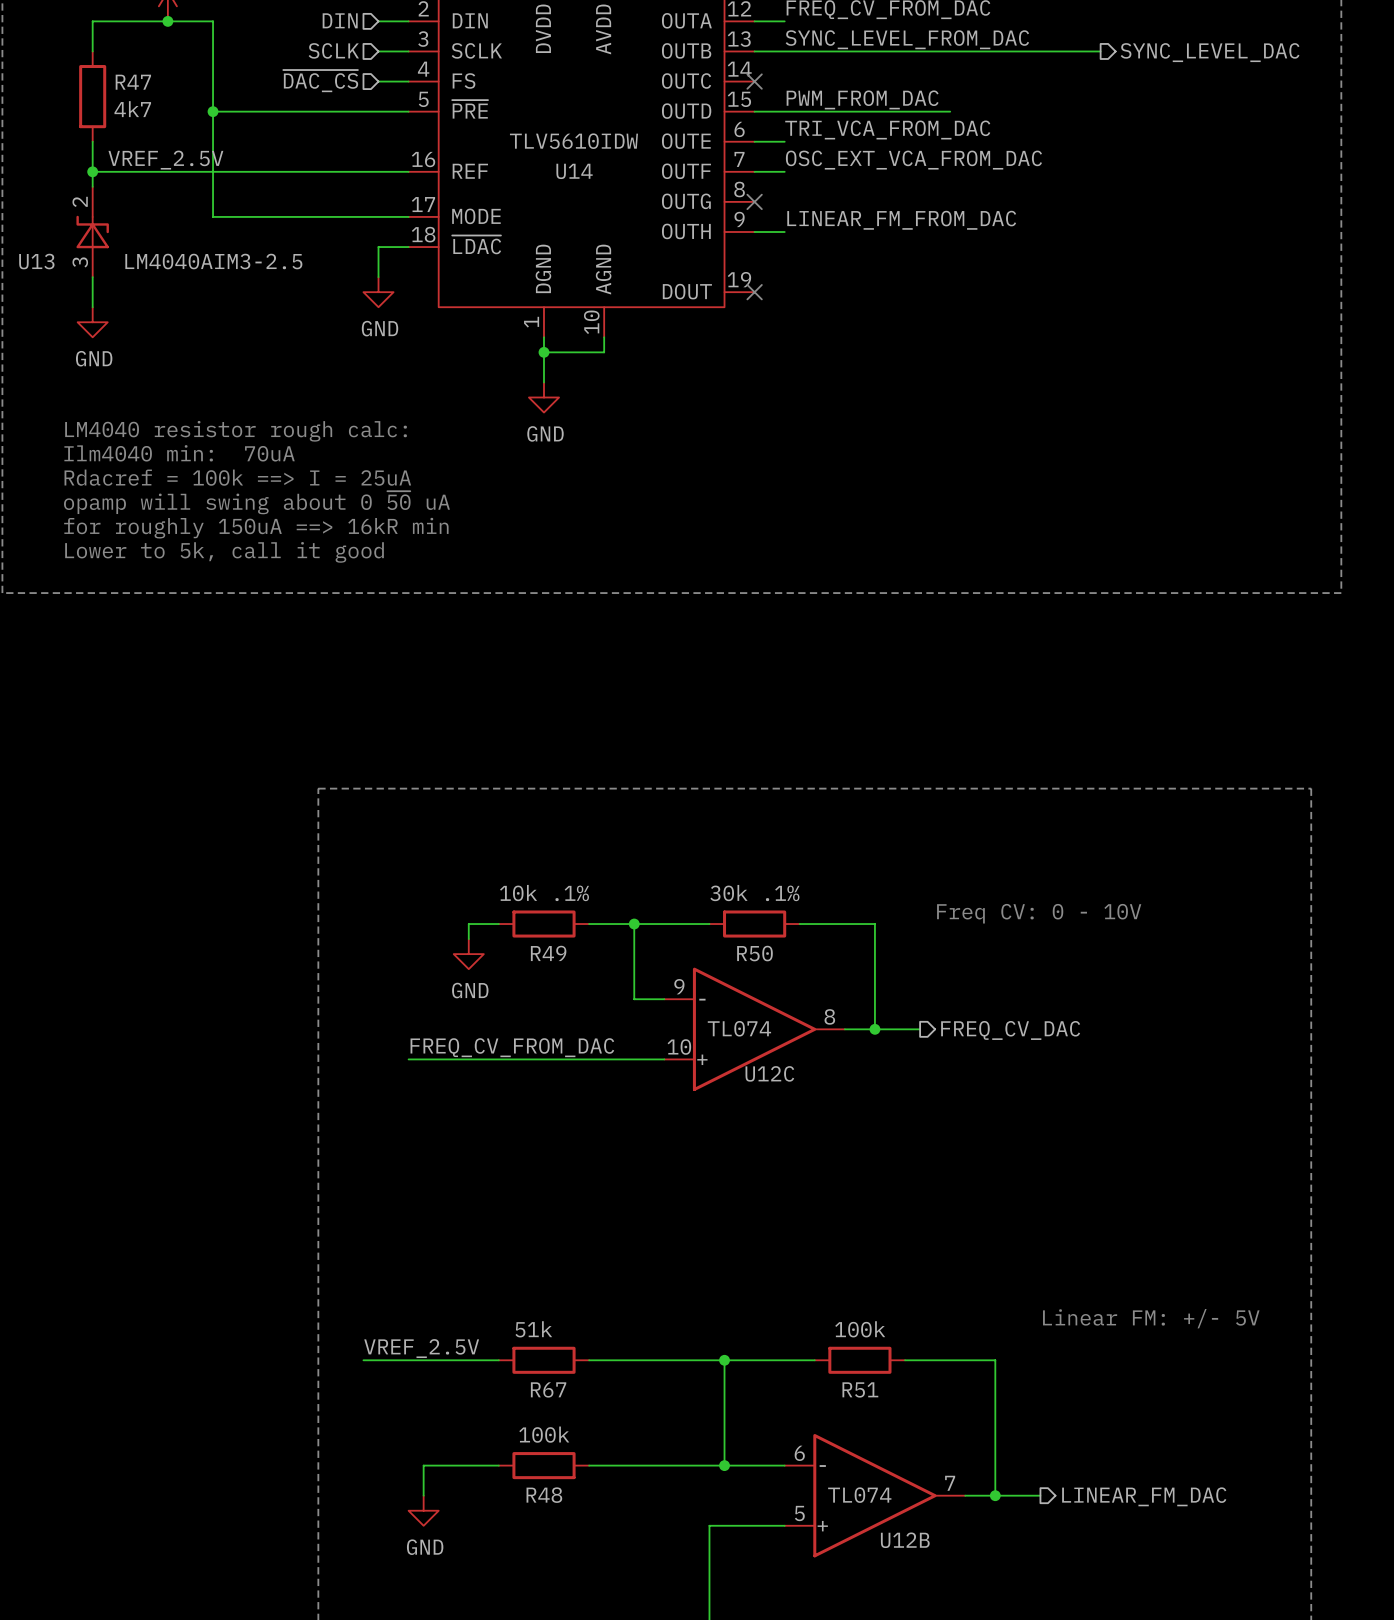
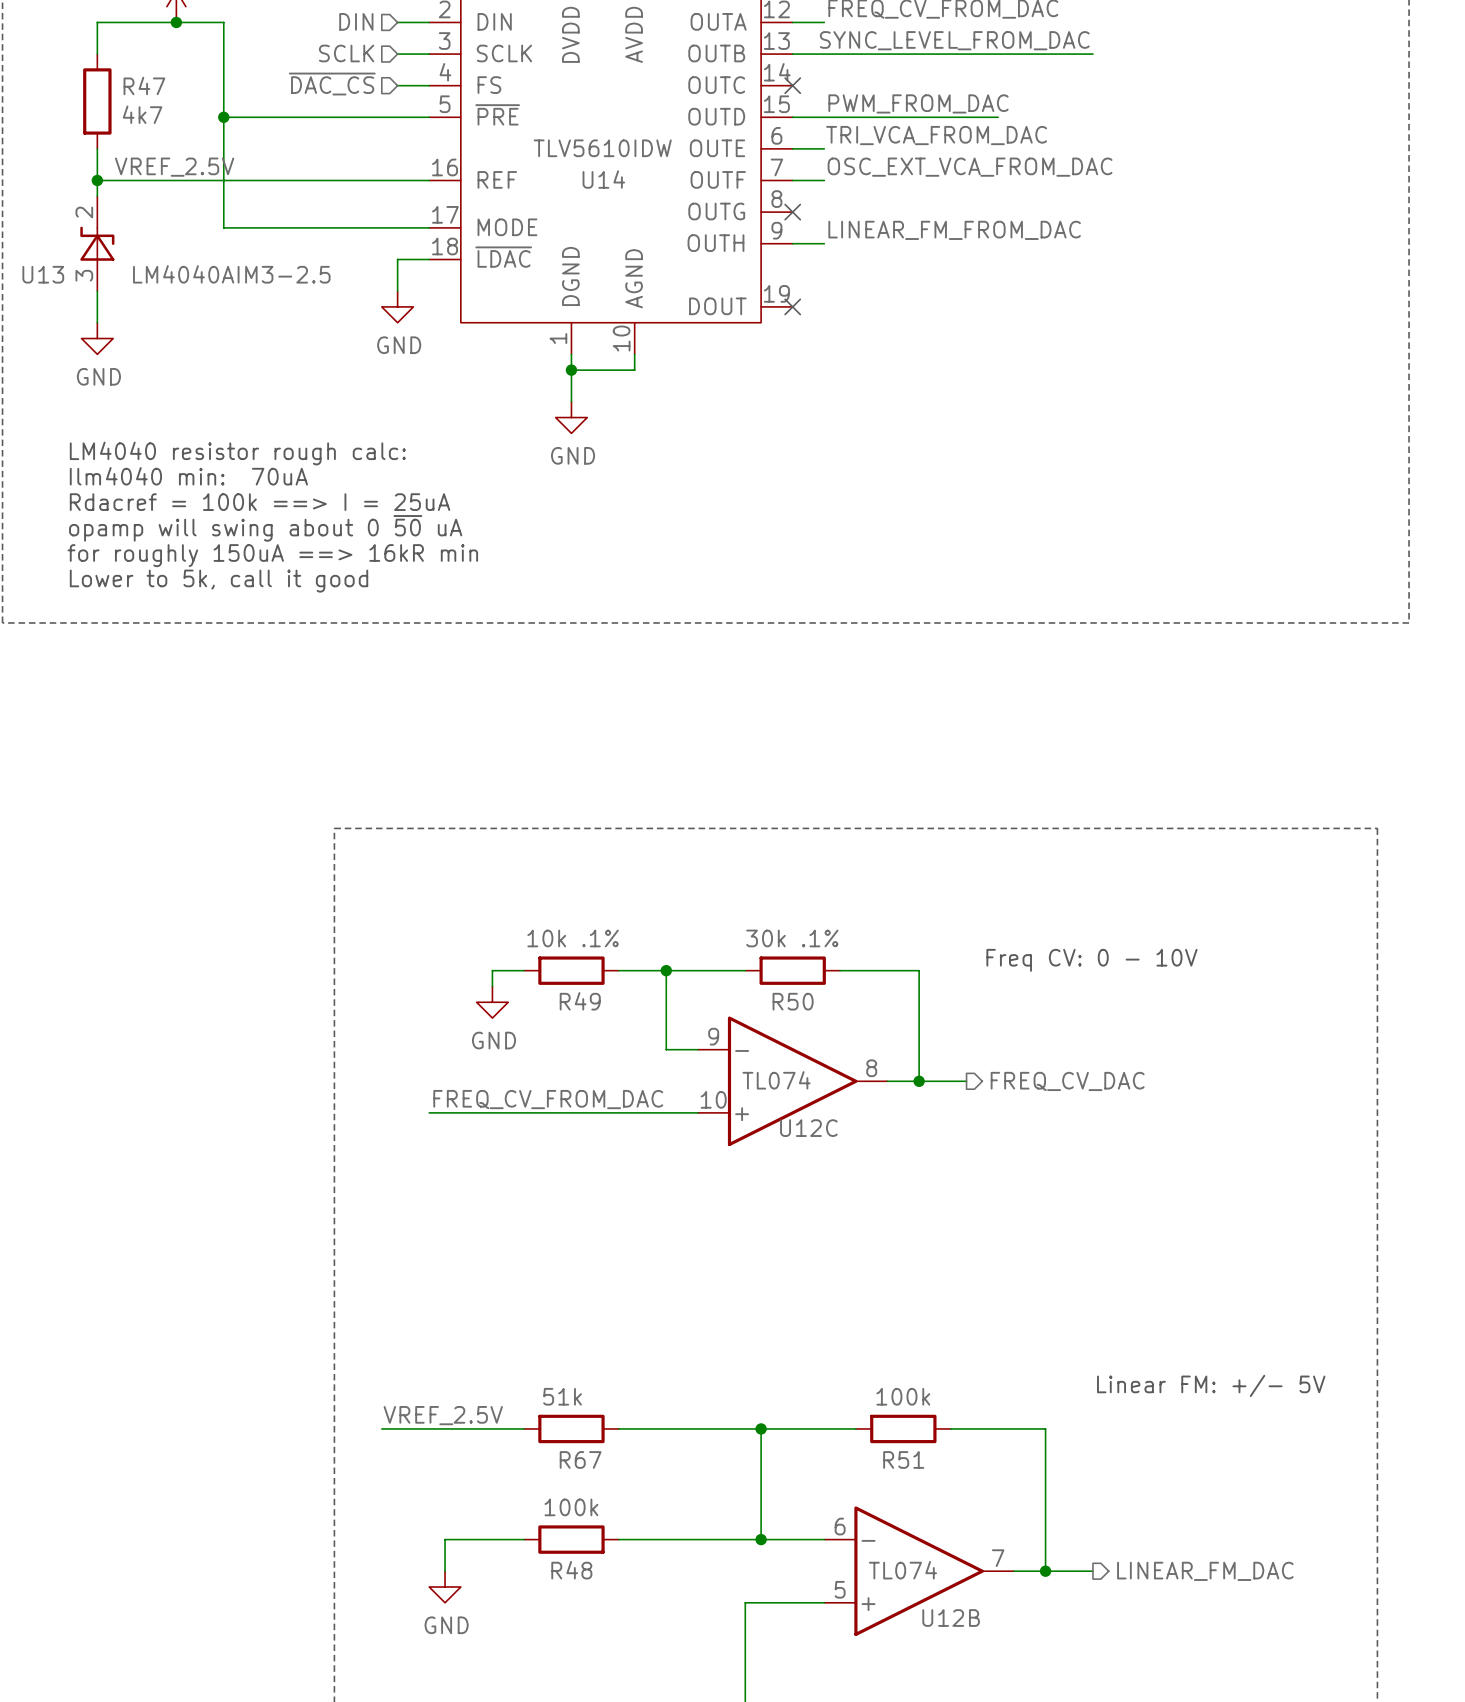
label position: SYNC_LEVEL_FROM_DAC (907, 39) -> SYNC_LEVEL_FROM_DAC (954, 40)
wire: (1040, 51) (1100, 51) -> none
hierarchical label: SYNC_LEVEL_DAC (1210, 52) -> none

